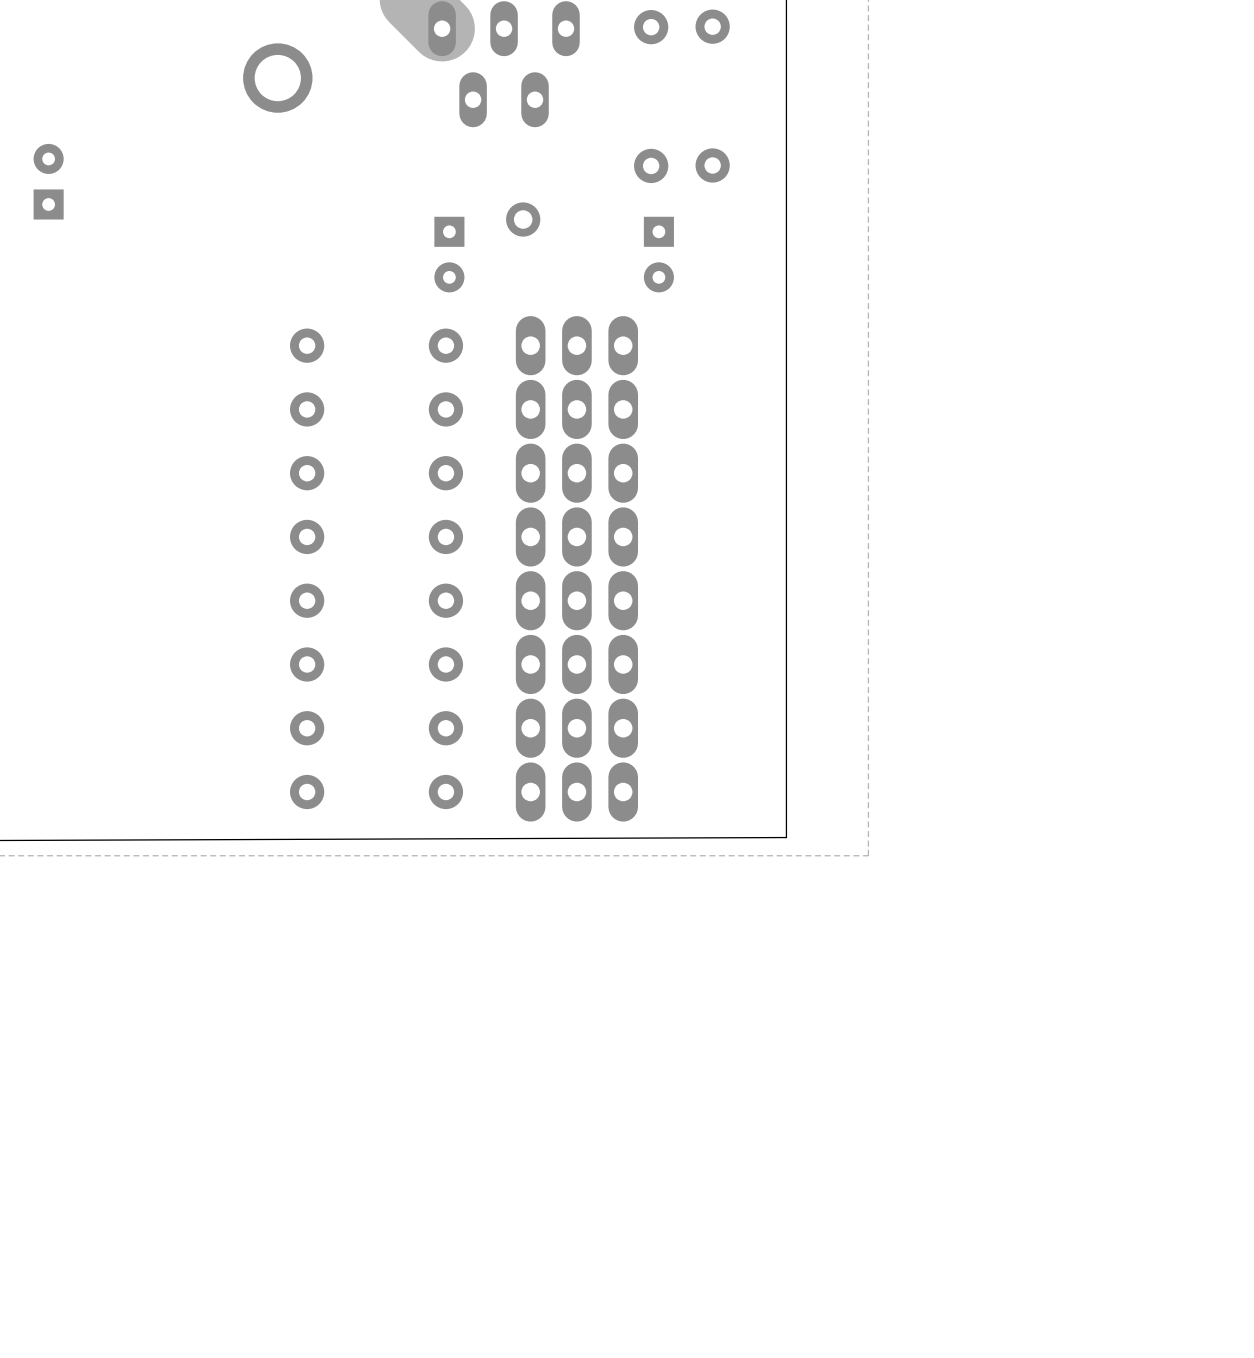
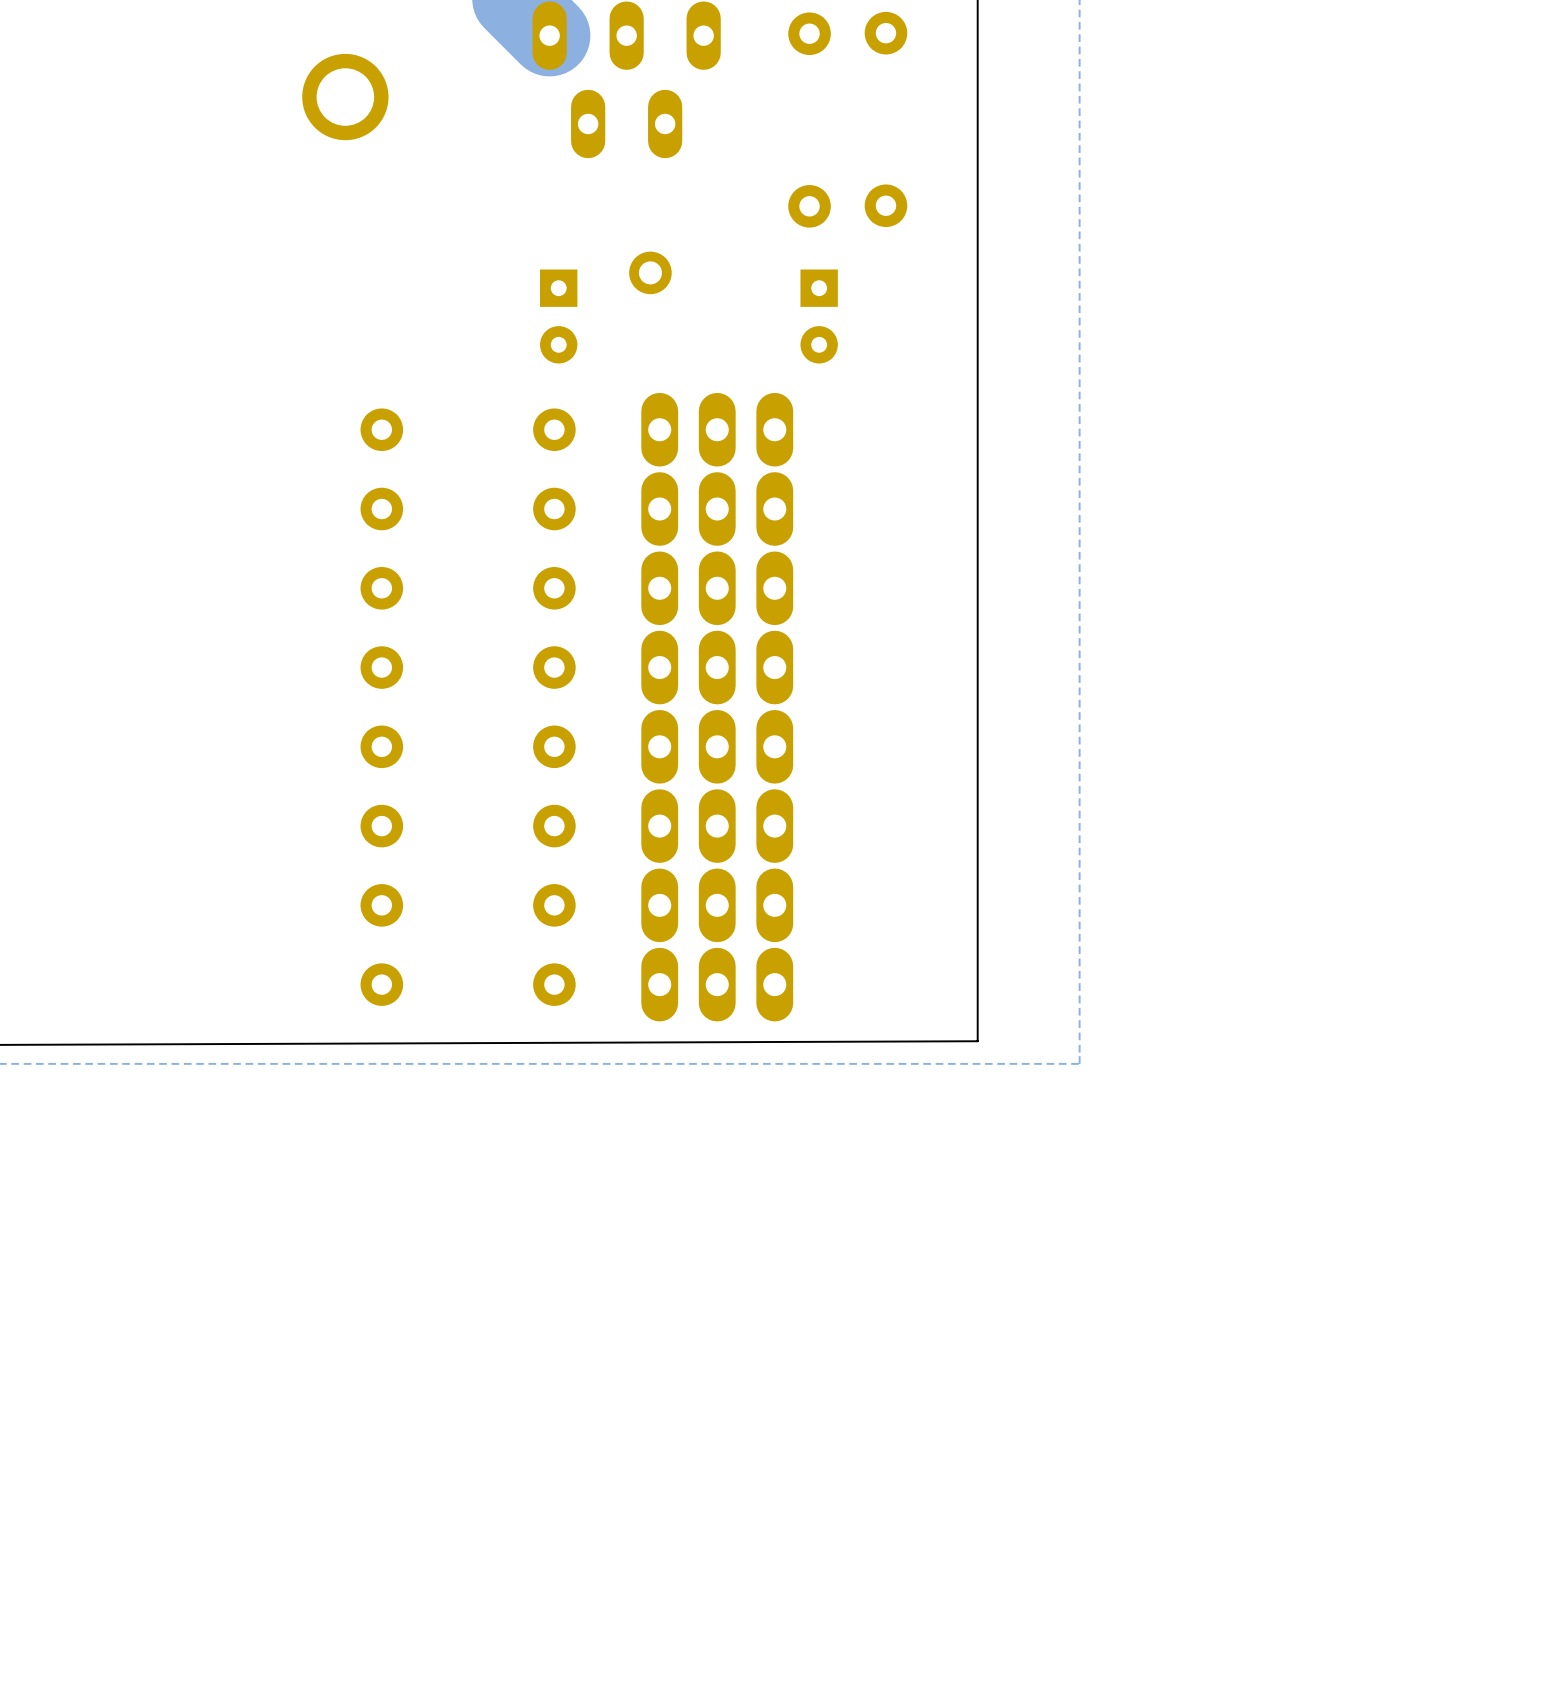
part: (48, 181) -> none

